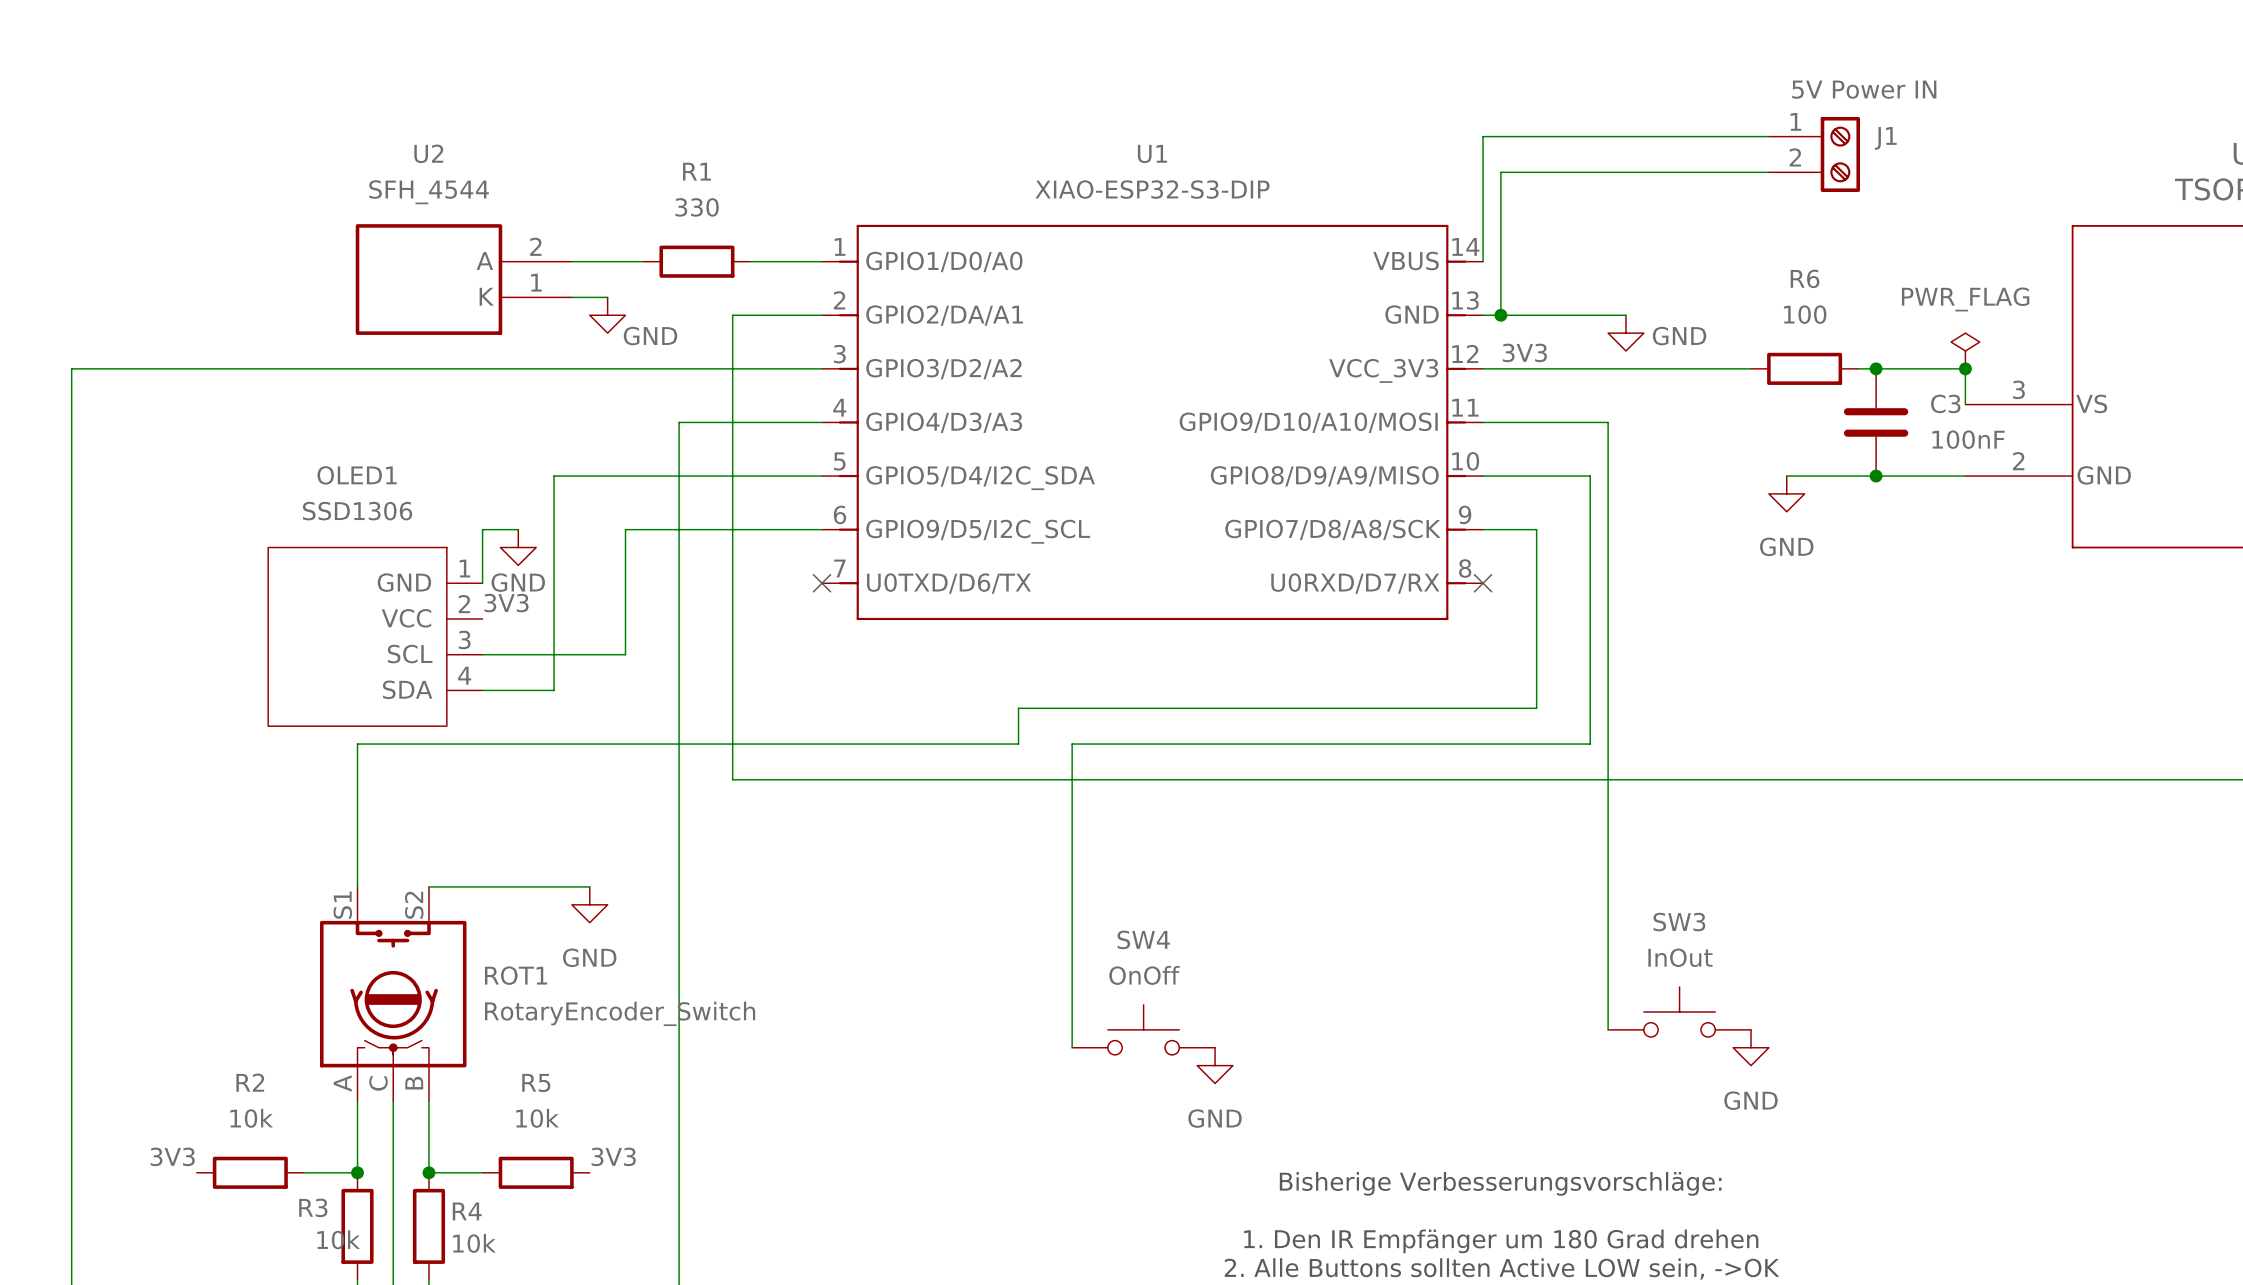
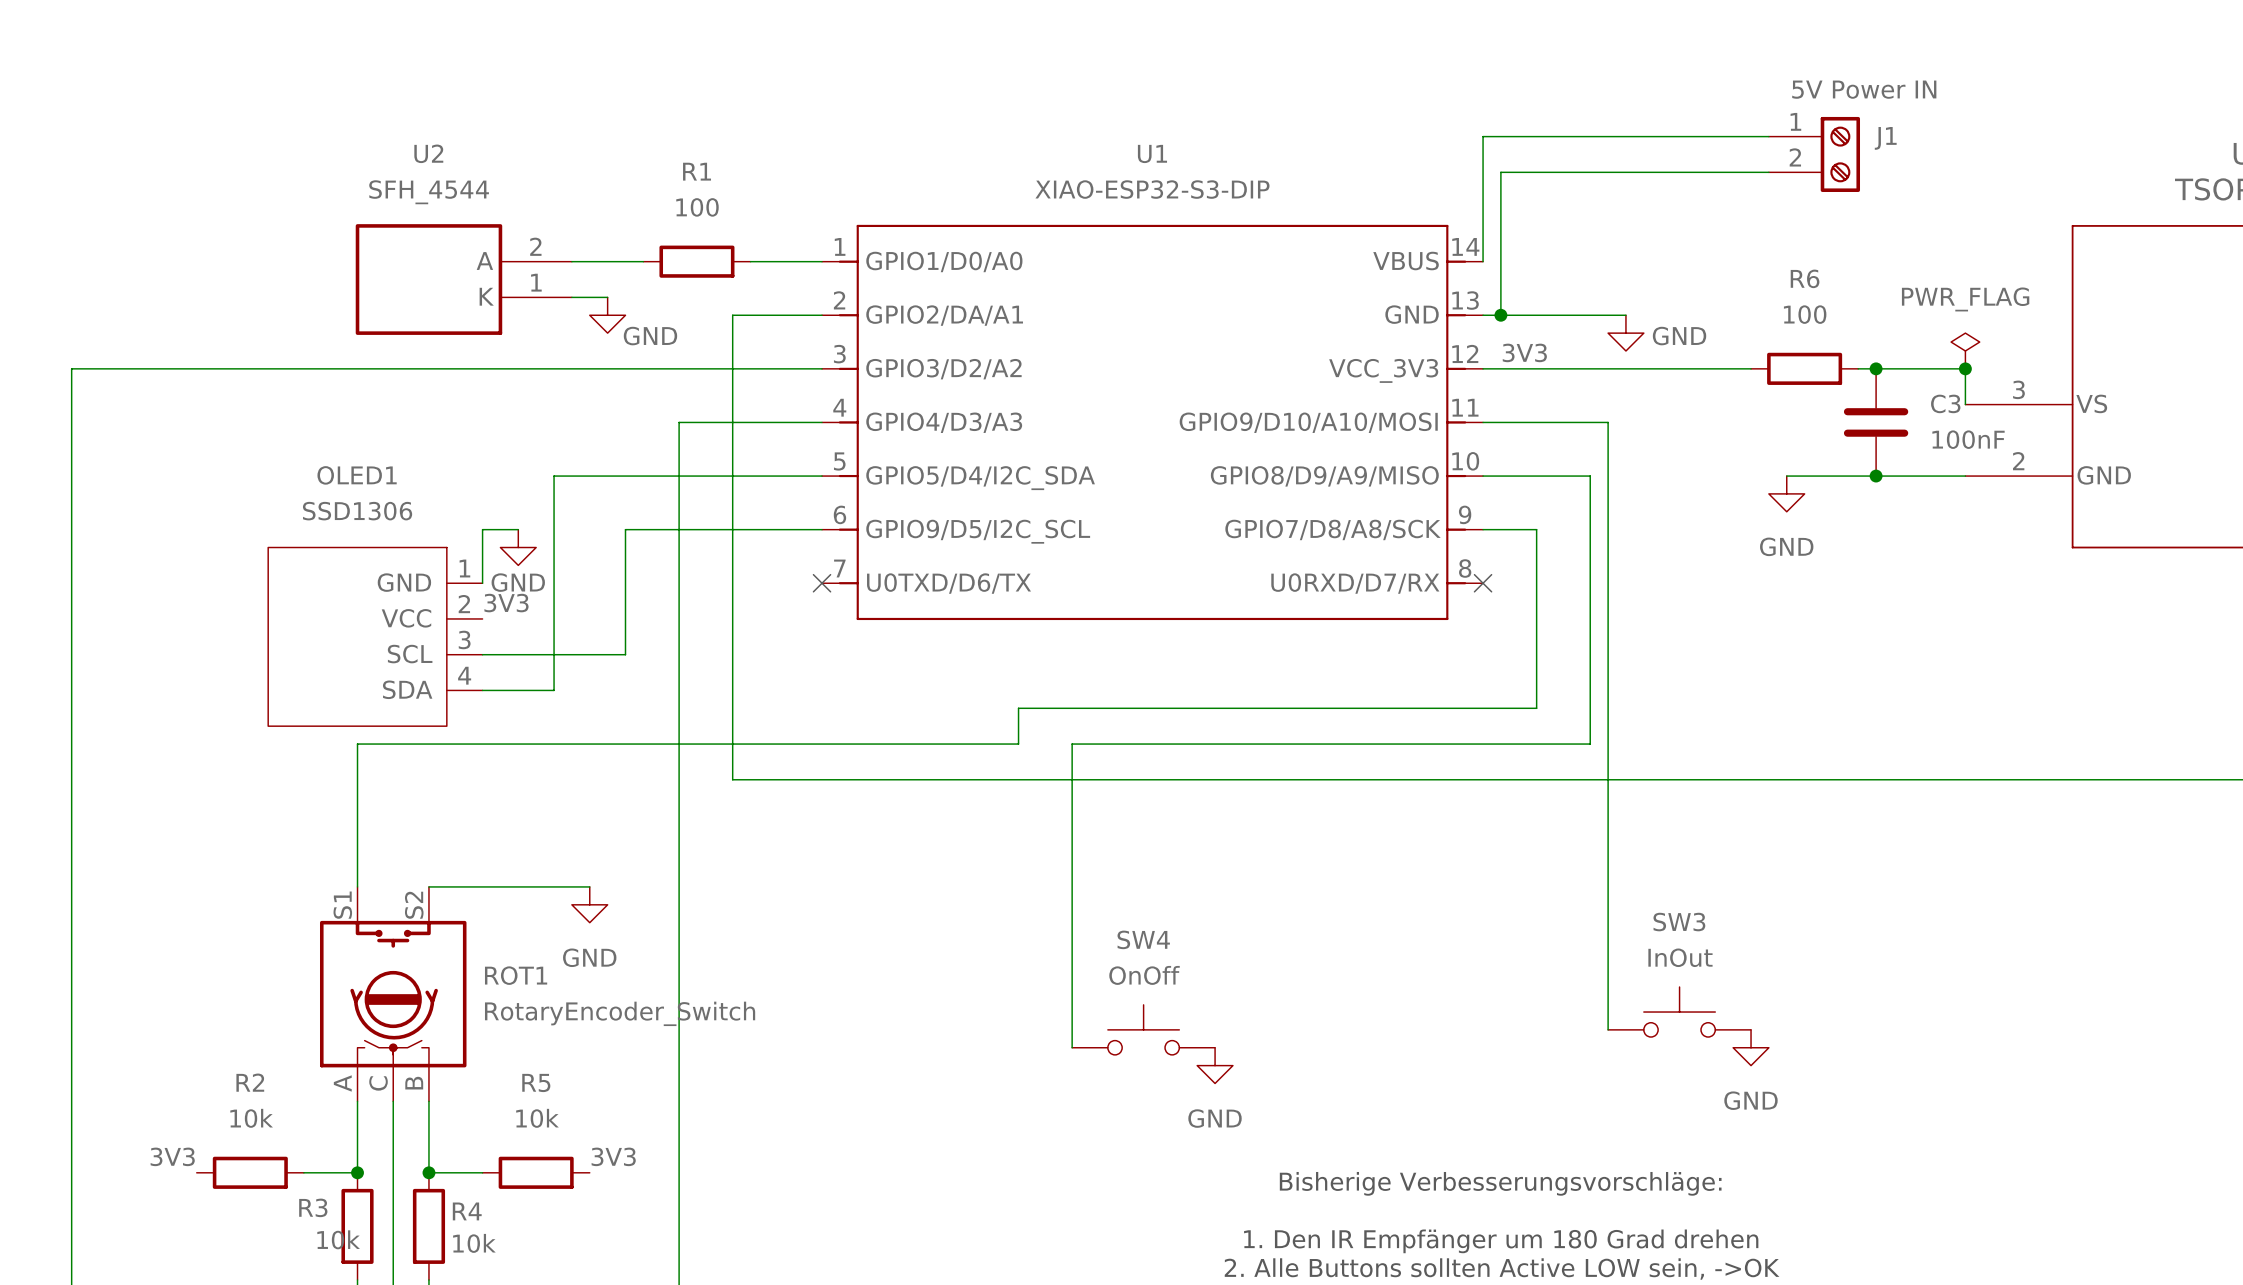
R1 value: 330 (697, 207) -> 100 (697, 207)

